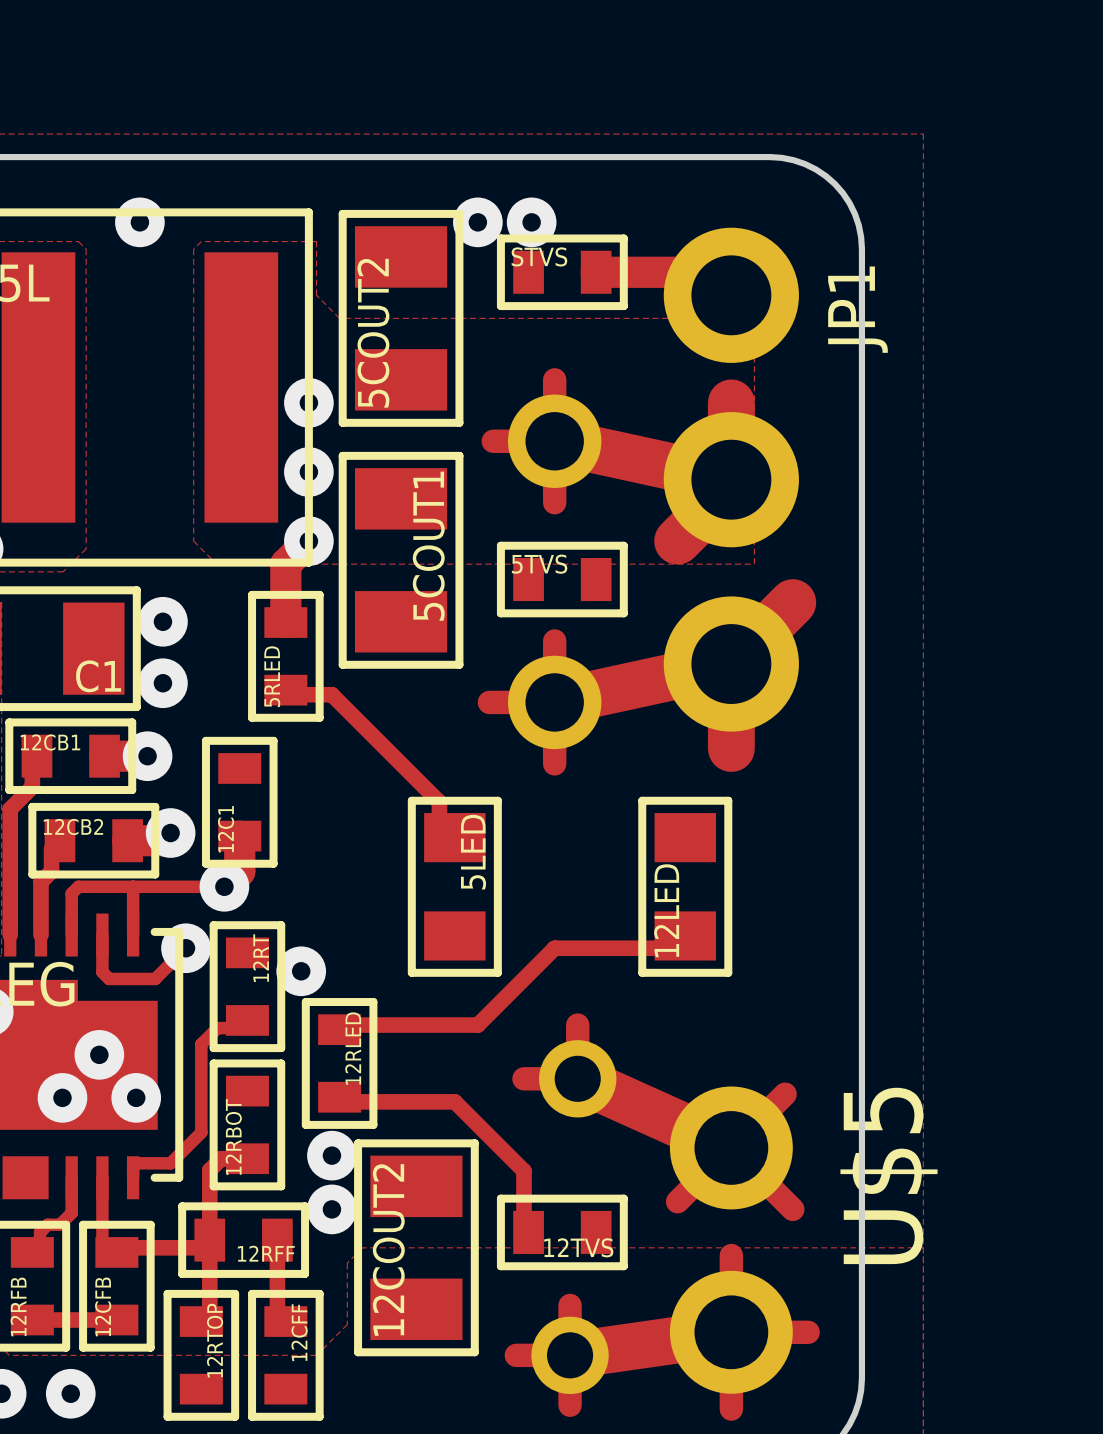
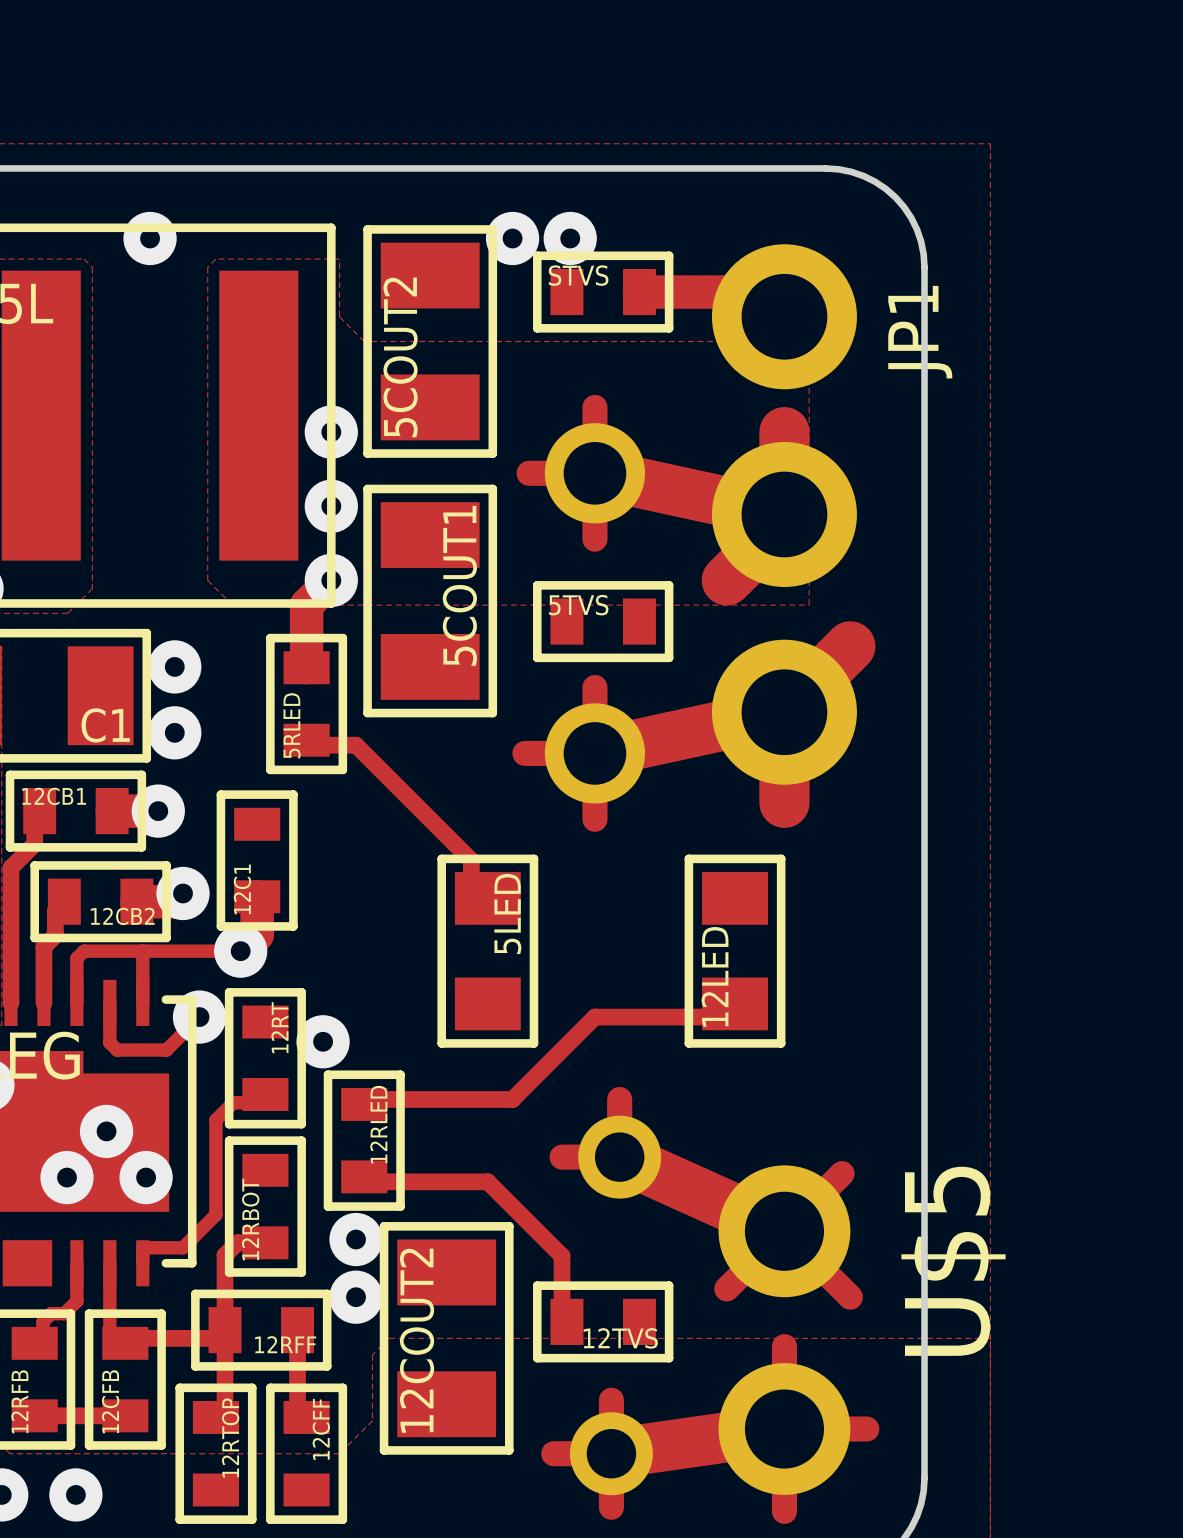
12CB2 name position: 12CB2 (73, 827) -> 12CB2 (122, 916)

